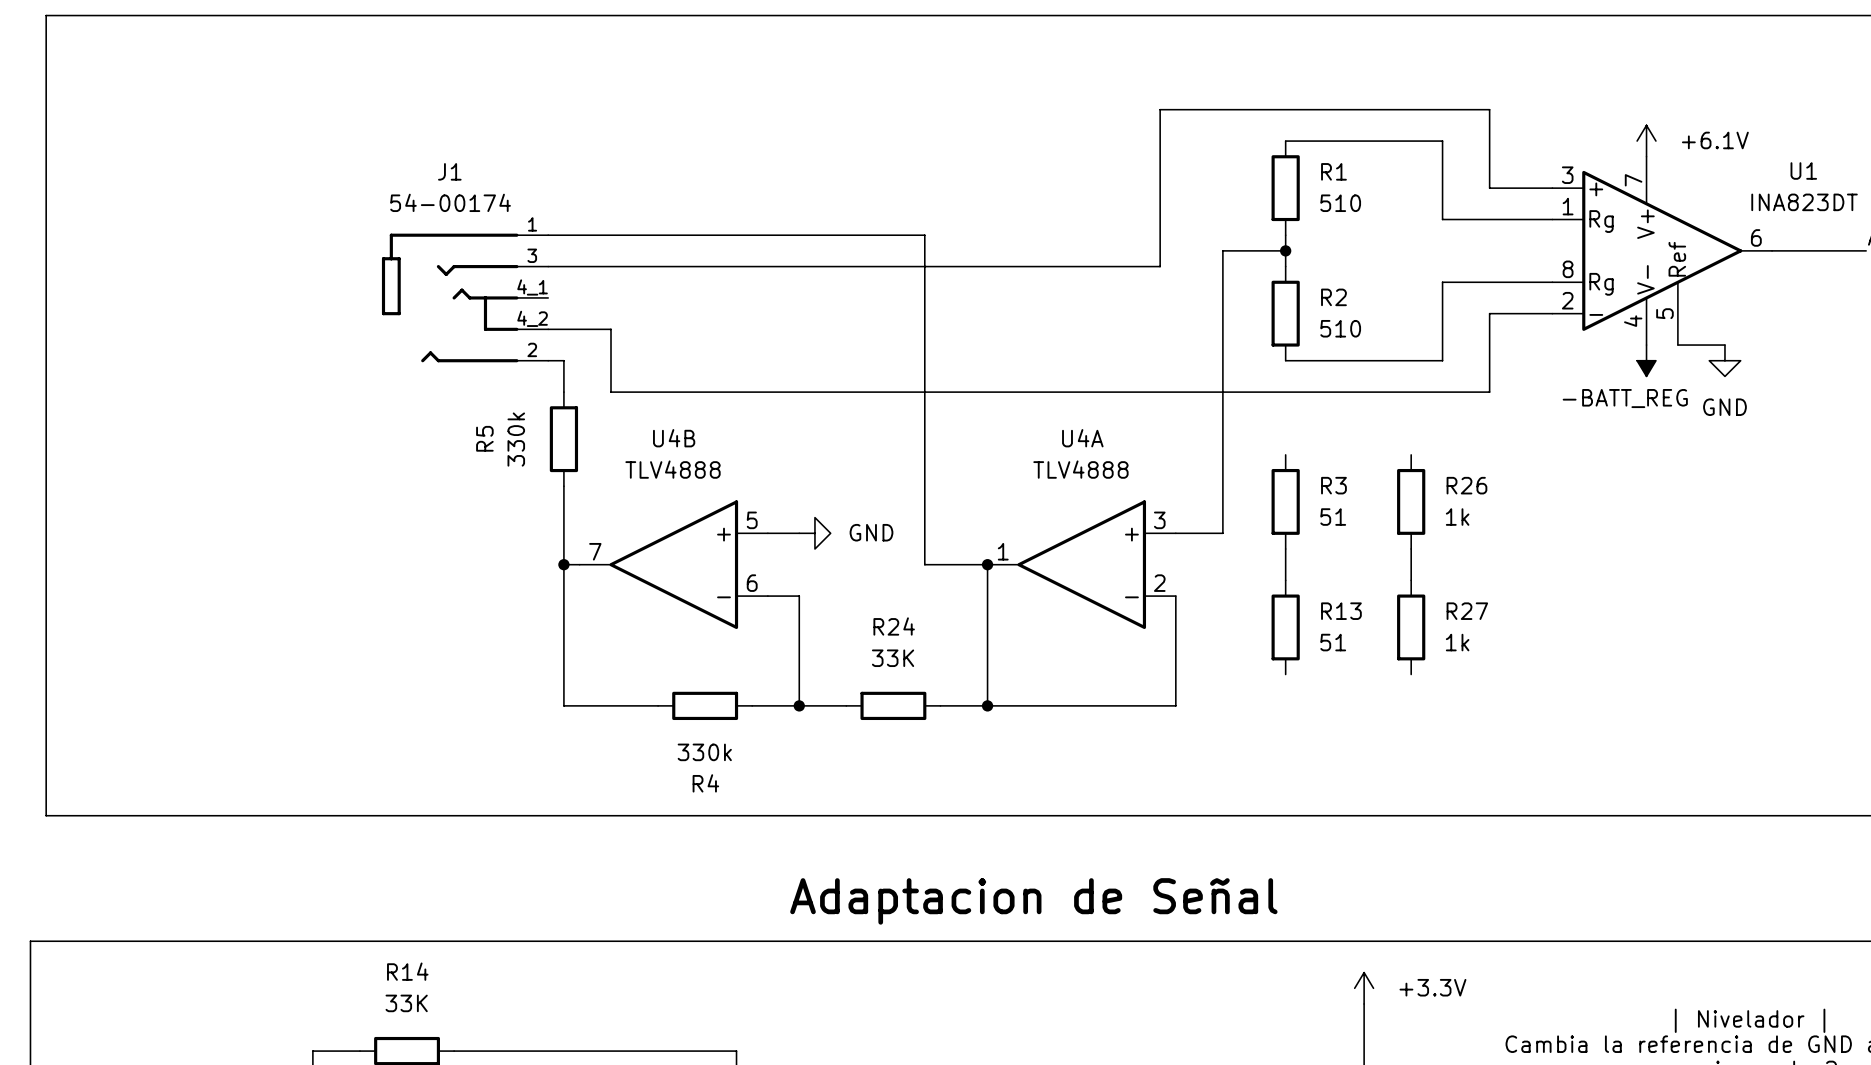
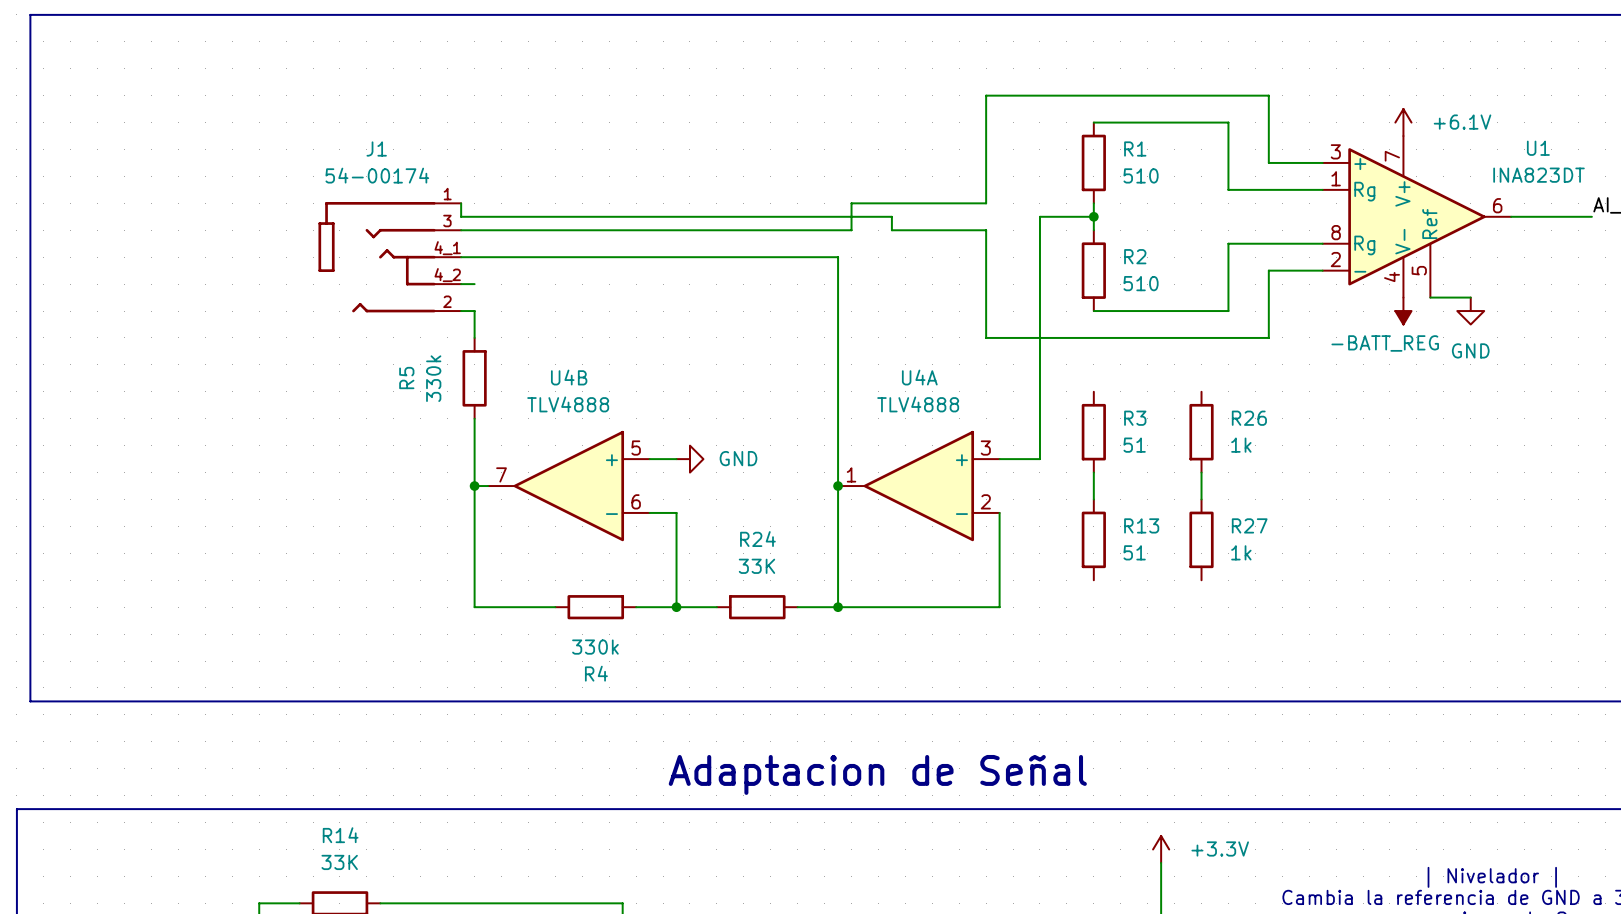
wire: (548, 235) (924, 235) (924, 564) (987, 564) -> (461, 257) (838, 257) (838, 486)
wire: none -> (461, 203) (461, 216) (891, 216) (891, 230)
wire: (1160, 235) (1160, 266) -> (986, 337) (986, 230)
wire: (1003, 266) (1050, 266) -> (851, 230) (851, 203) (986, 203)
wire: (563, 329) (611, 329) (611, 392) (1160, 392) -> none

